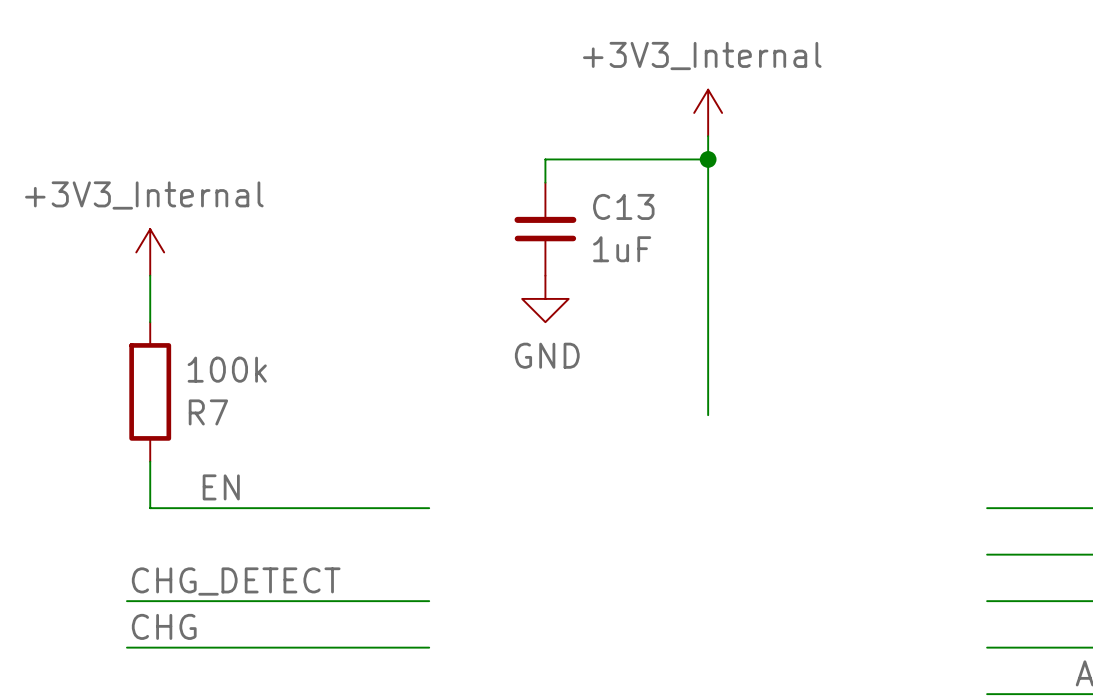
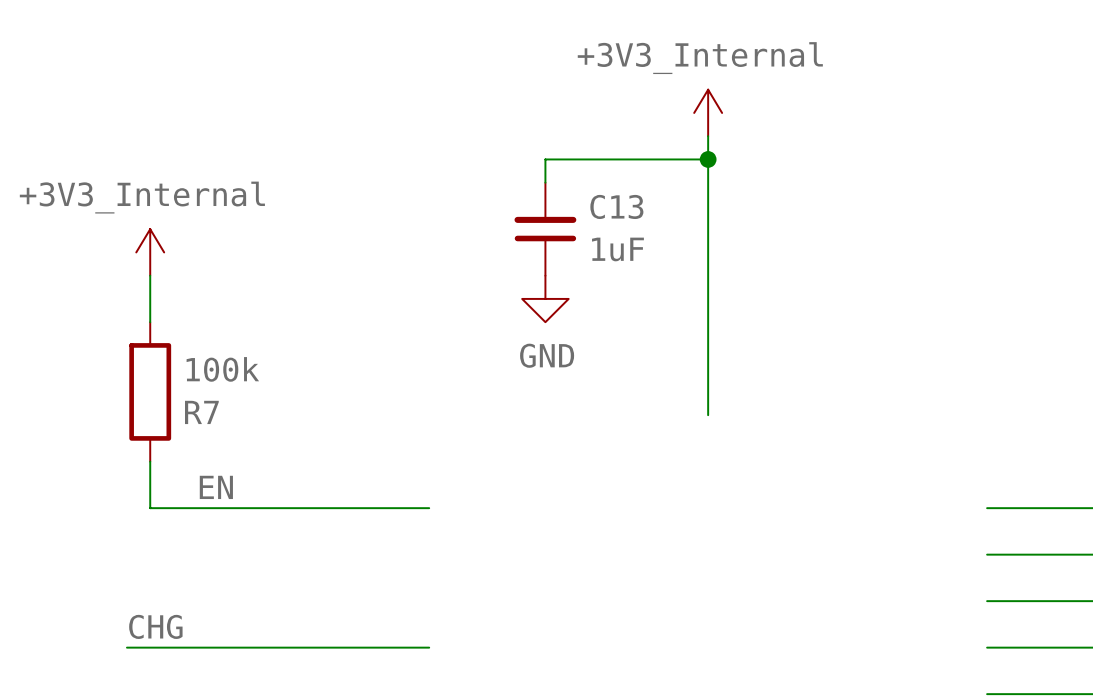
label: CHG_DETECT (236, 581) -> none
wire: (126, 601) (429, 601) -> none

